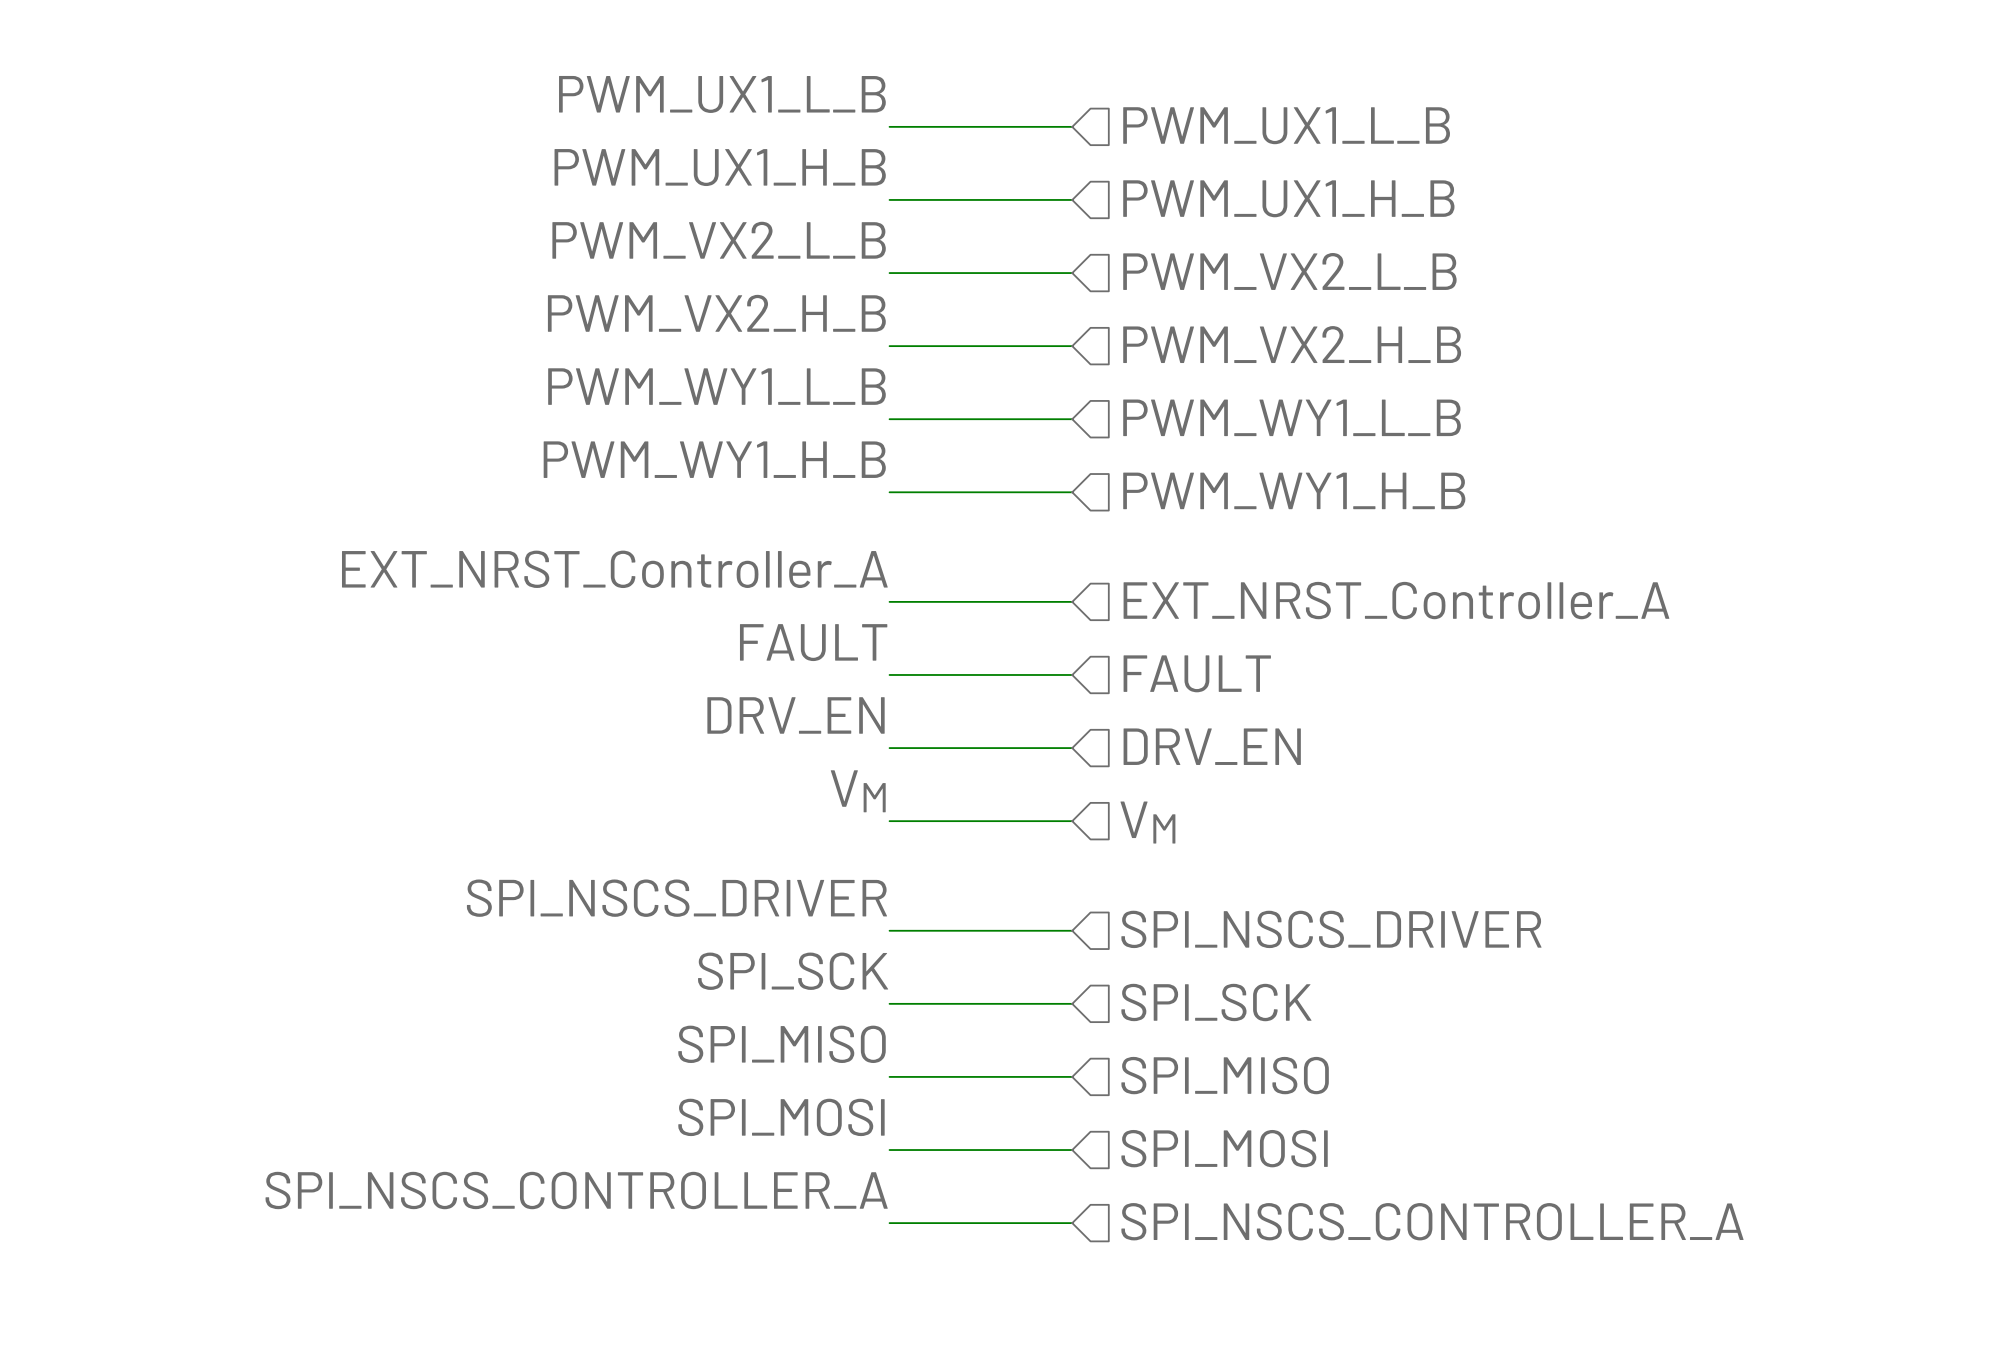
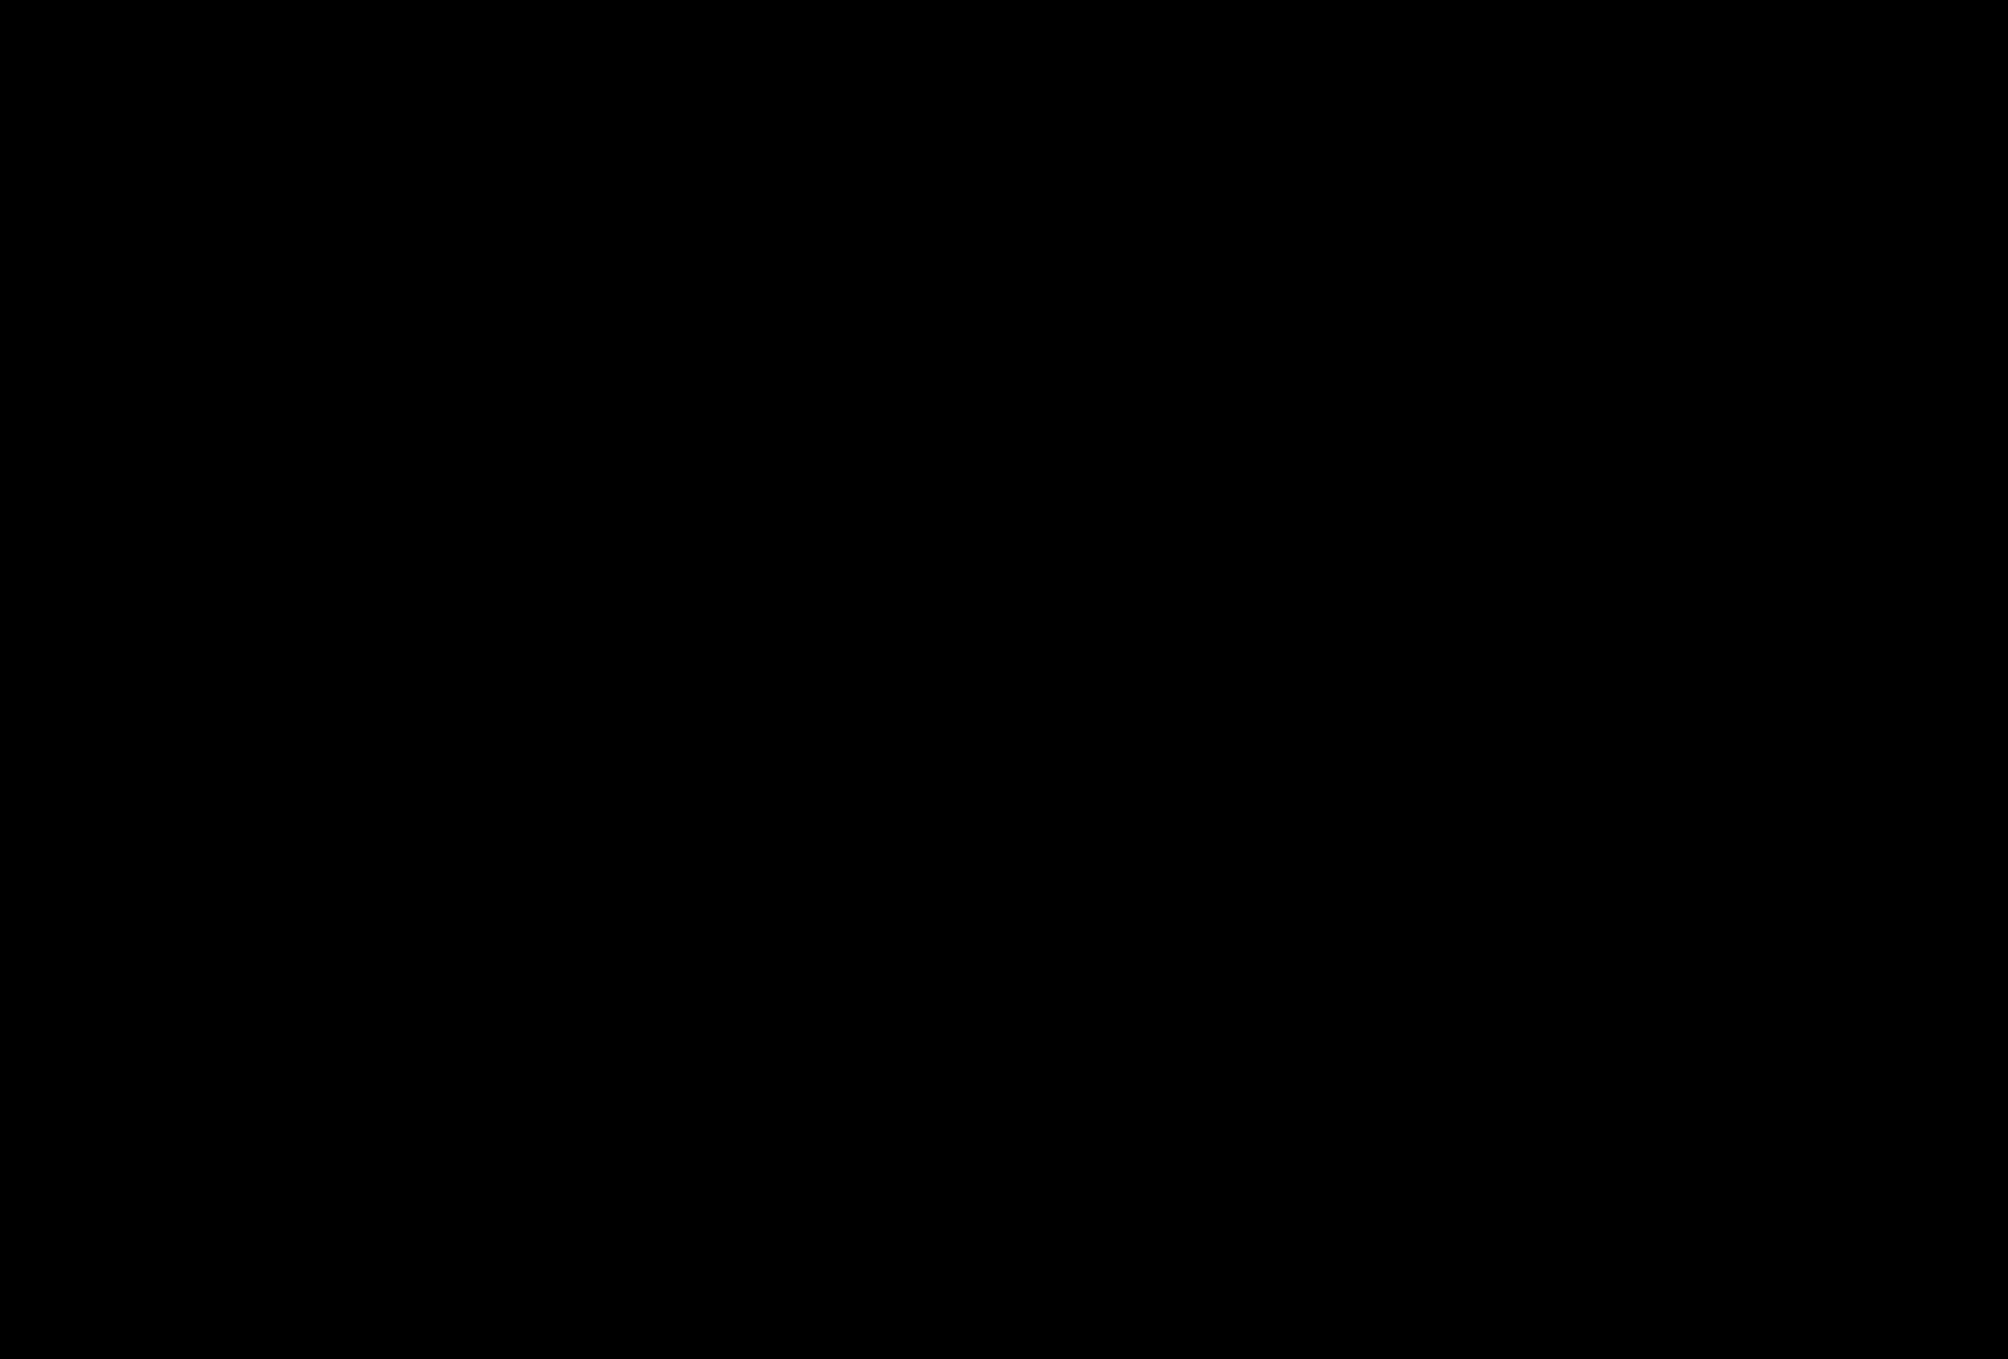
label: PWM_UX1_L_B (722, 94) -> none
hierarchical label: PWM_UX1_L_B (1286, 125) -> none
wire: (889, 126) (1072, 126) -> none
label: PWM_UX1_H_B (720, 167) -> none
hierarchical label: PWM_UX1_H_B (1288, 198) -> none
wire: (889, 199) (1072, 199) -> none
label: PWM_VX2_L_B (719, 240) -> none
hierarchical label: PWM_VX2_L_B (1289, 271) -> none
wire: (889, 273) (1072, 273) -> none
label: PWM_VX2_H_B (716, 313) -> none
hierarchical label: PWM_VX2_H_B (1292, 344) -> none
wire: (889, 346) (1072, 346) -> none
label: PWM_WY1_L_B (716, 386) -> none
hierarchical label: PWM_WY1_L_B (1292, 417) -> none
wire: (889, 419) (1072, 419) -> none
label: PWM_WY1_H_B (714, 459) -> none
hierarchical label: PWM_WY1_H_B (1294, 490) -> none
wire: (889, 492) (1072, 492) -> none
label: EXT_NRST_Controller_A (614, 569) -> none
hierarchical label: EXT_NRST_Controller_A (1396, 600) -> none
wire: (889, 601) (1072, 601) -> none
label: FAULT (813, 642) -> none
hierarchical label: FAULT (1197, 673) -> none
wire: (889, 674) (1072, 674) -> none
label: DRV_EN (796, 715) -> none
hierarchical label: DRV_EN (1212, 746) -> none
wire: (889, 748) (1072, 748) -> none
label: VM (858, 791) -> none
wire: (889, 821) (1072, 821) -> none
hierarchical label: VM (1147, 822) -> none
label: SPI_NSCS_DRIVER (676, 898) -> none
hierarchical label: SPI_NSCS_DRIVER (1331, 929) -> none
wire: (889, 930) (1072, 930) -> none
label: SPI_SCK (793, 971) -> none
hierarchical label: SPI_SCK (1216, 1002) -> none
wire: (889, 1003) (1072, 1003) -> none
label: SPI_MISO (782, 1044) -> none
hierarchical label: SPI_MISO (1225, 1075) -> none
wire: (889, 1076) (1072, 1076) -> none
label: SPI_MOSI (781, 1117) -> none
hierarchical label: SPI_MOSI (1224, 1148) -> none
wire: (889, 1150) (1072, 1150) -> none
label: SPI_NSCS_CONTROLLER_A (576, 1190) -> none
hierarchical label: SPI_NSCS_CONTROLLER_A (1432, 1221) -> none
wire: (889, 1223) (1072, 1223) -> none

